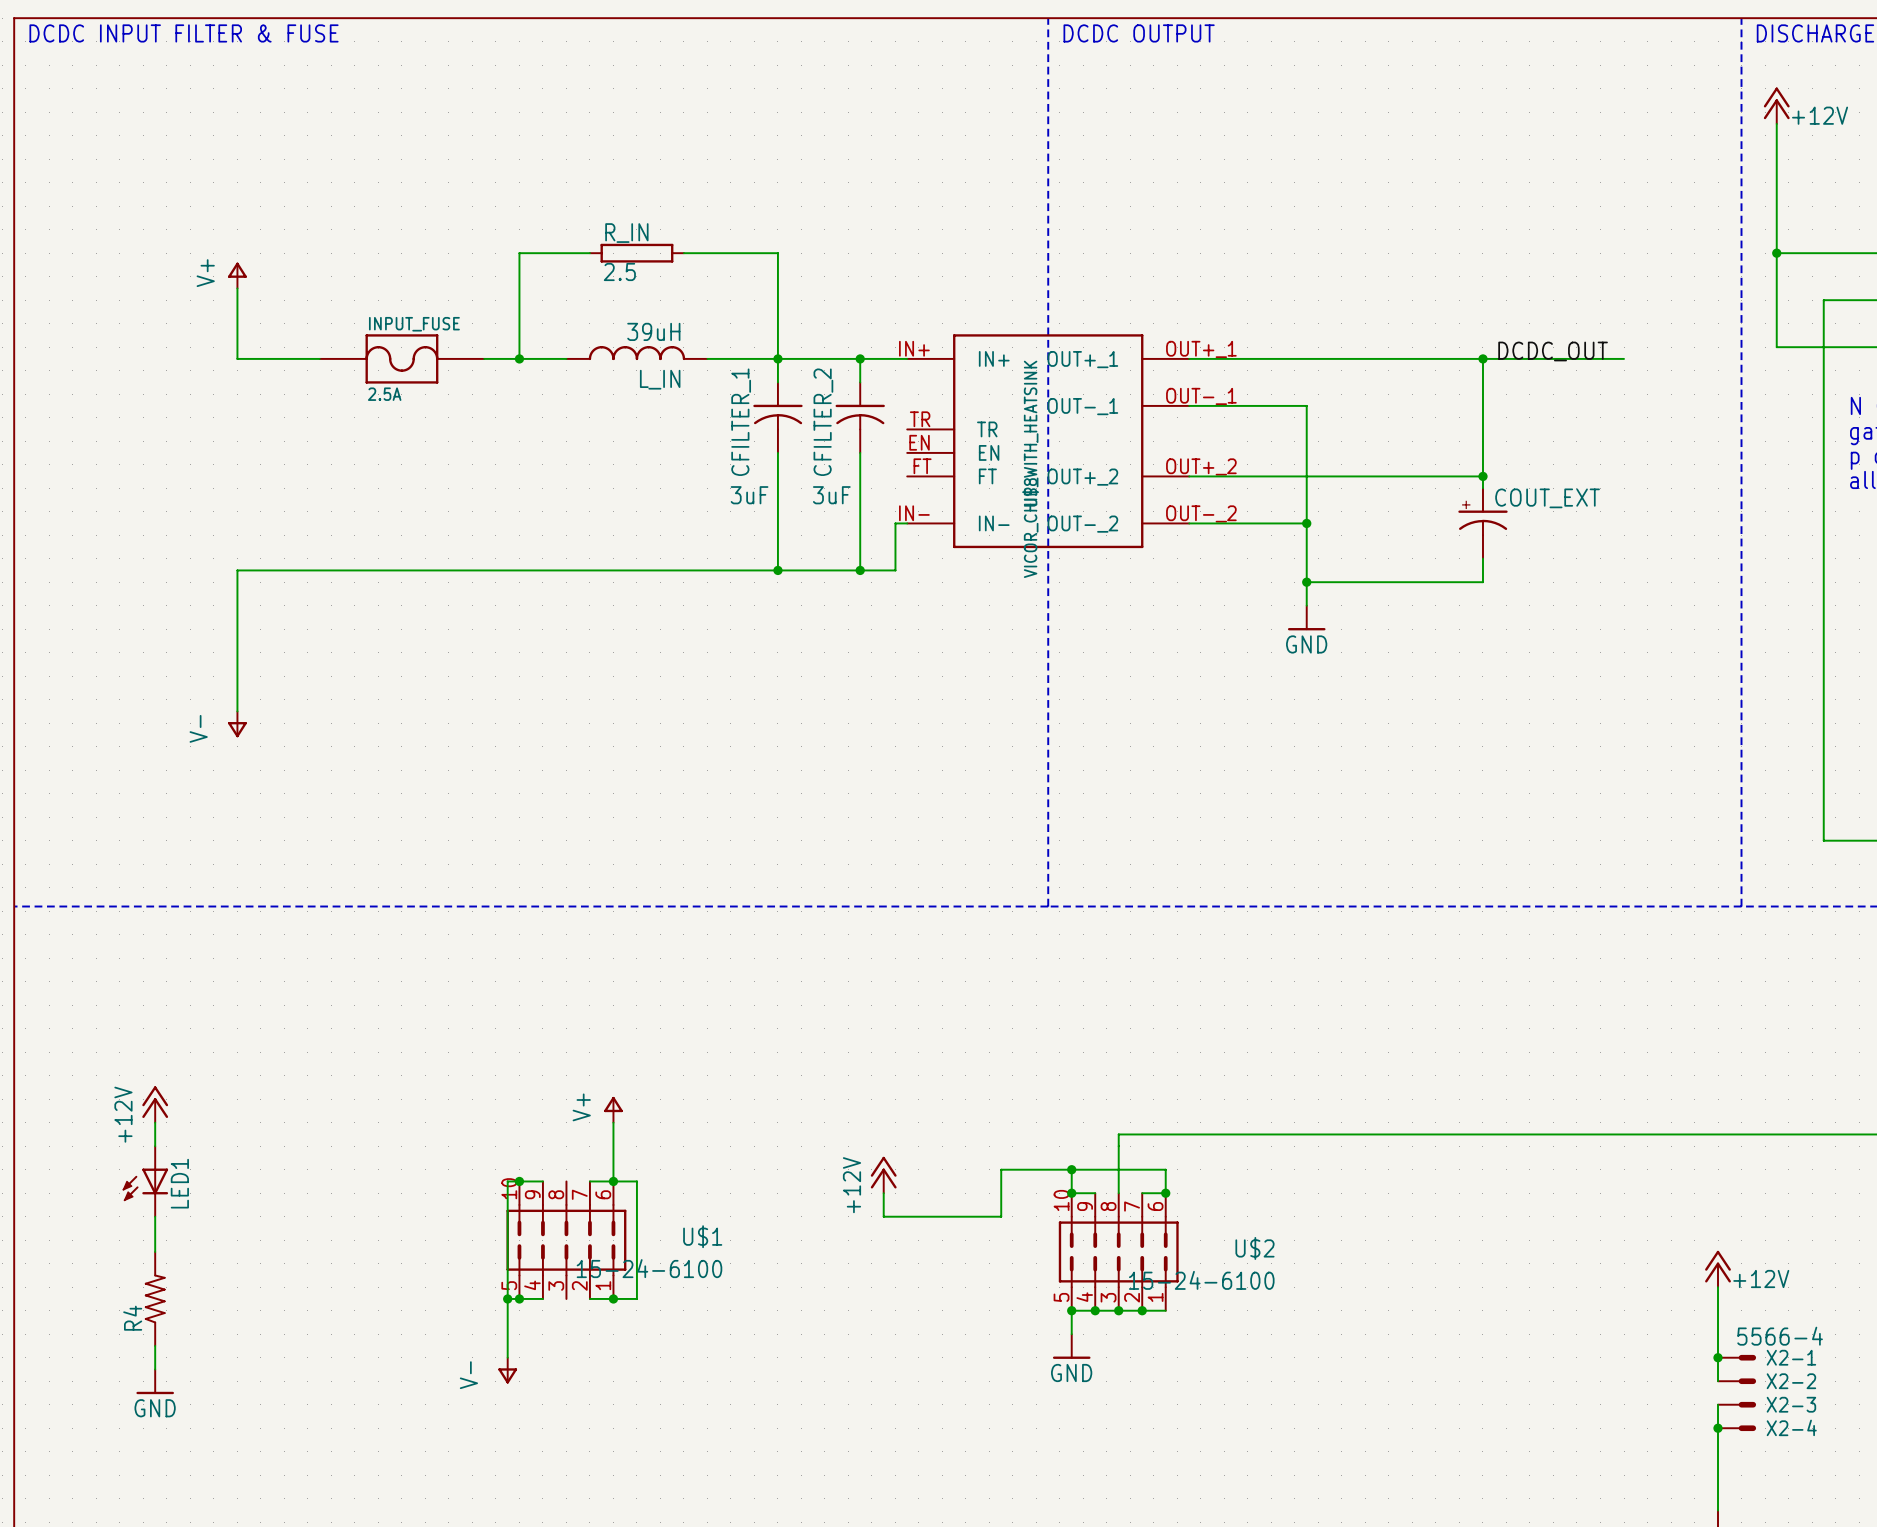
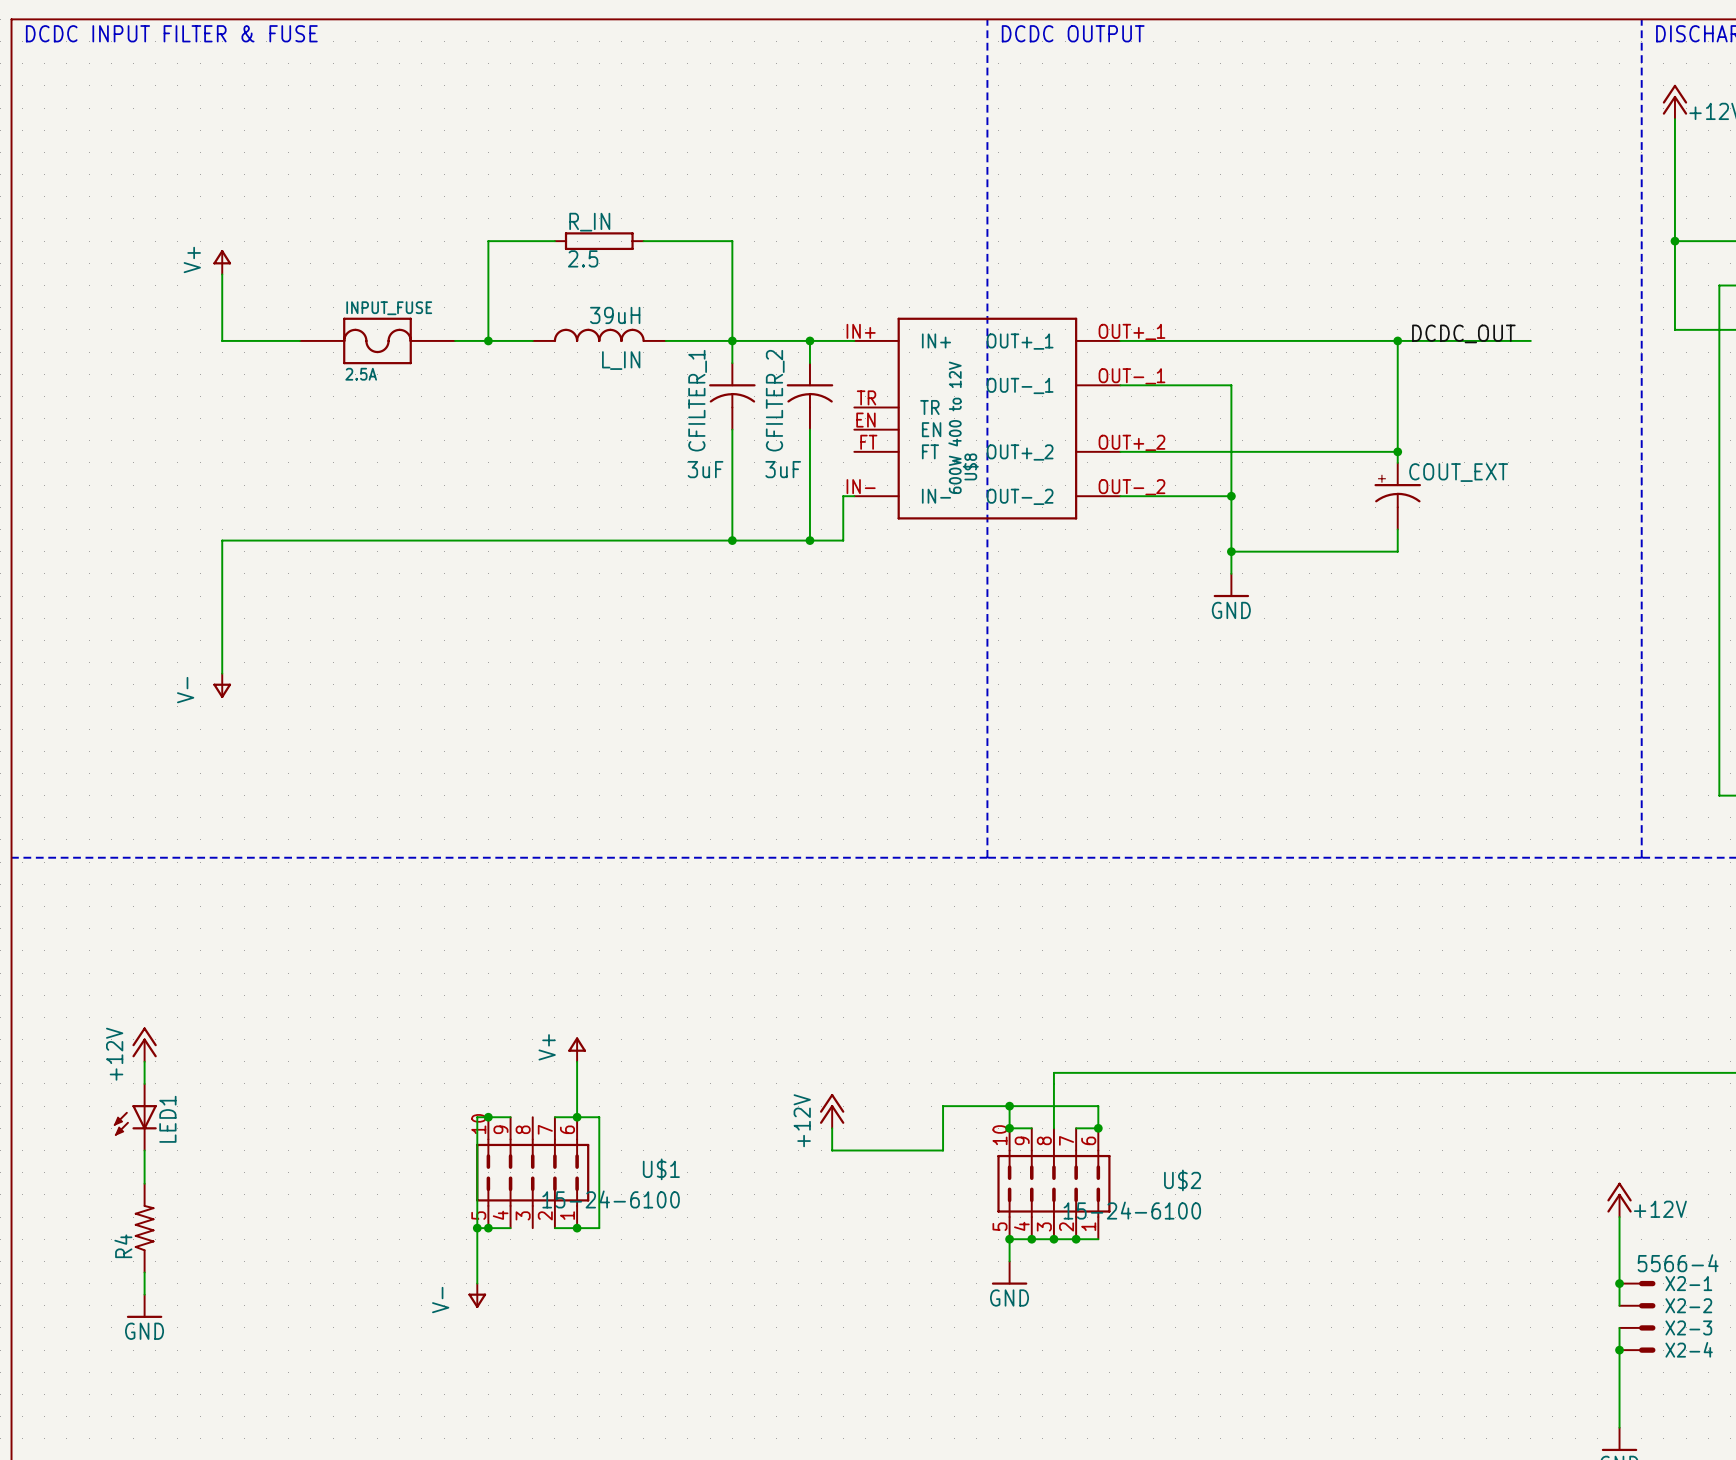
U$8 value: VICOR_CHIP_WITH_HEATSINK (1031, 469) -> 600W 400 to 12V (954, 427)

